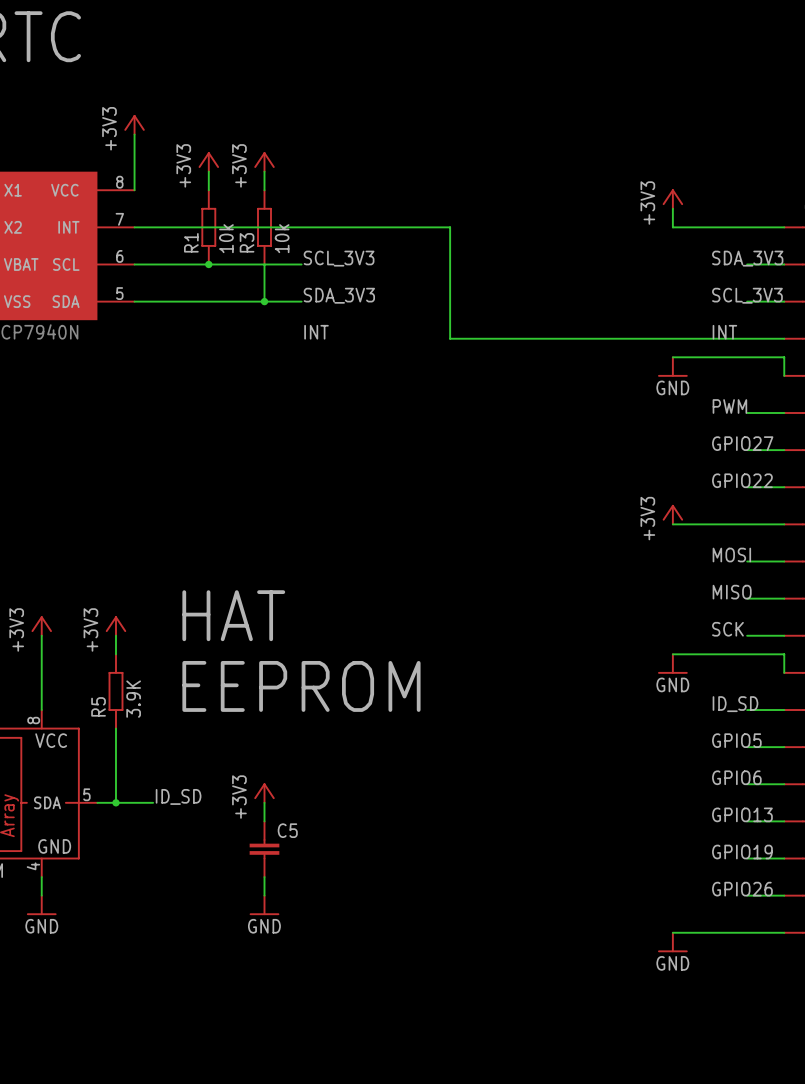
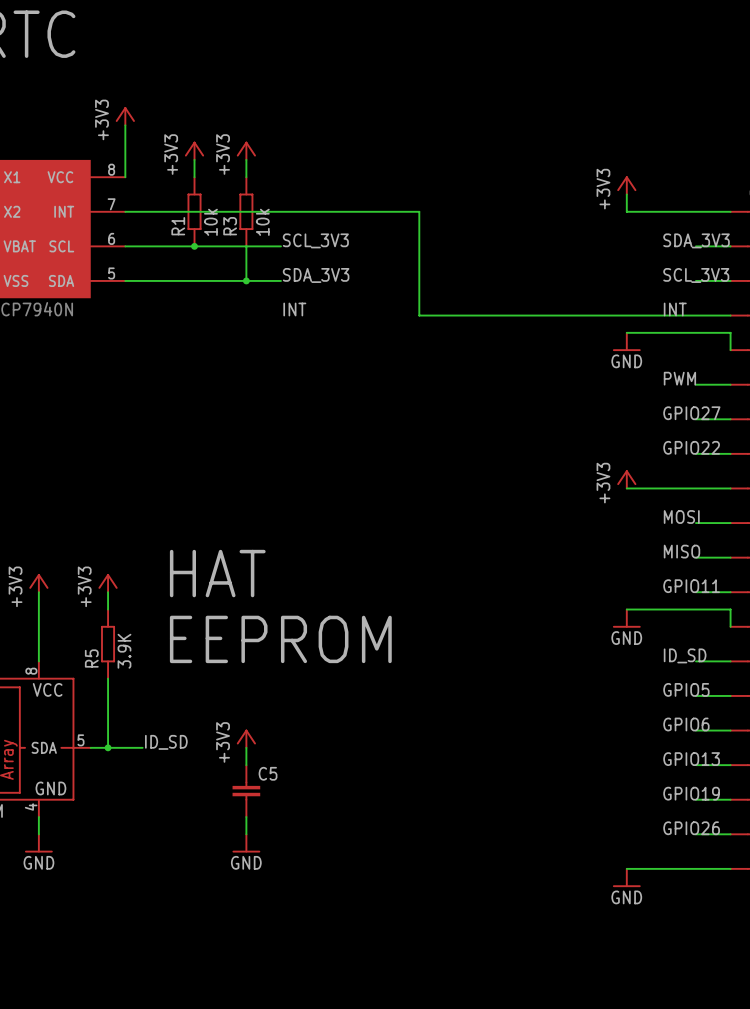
label: SCK (727, 629) -> GPIO11 (691, 586)

